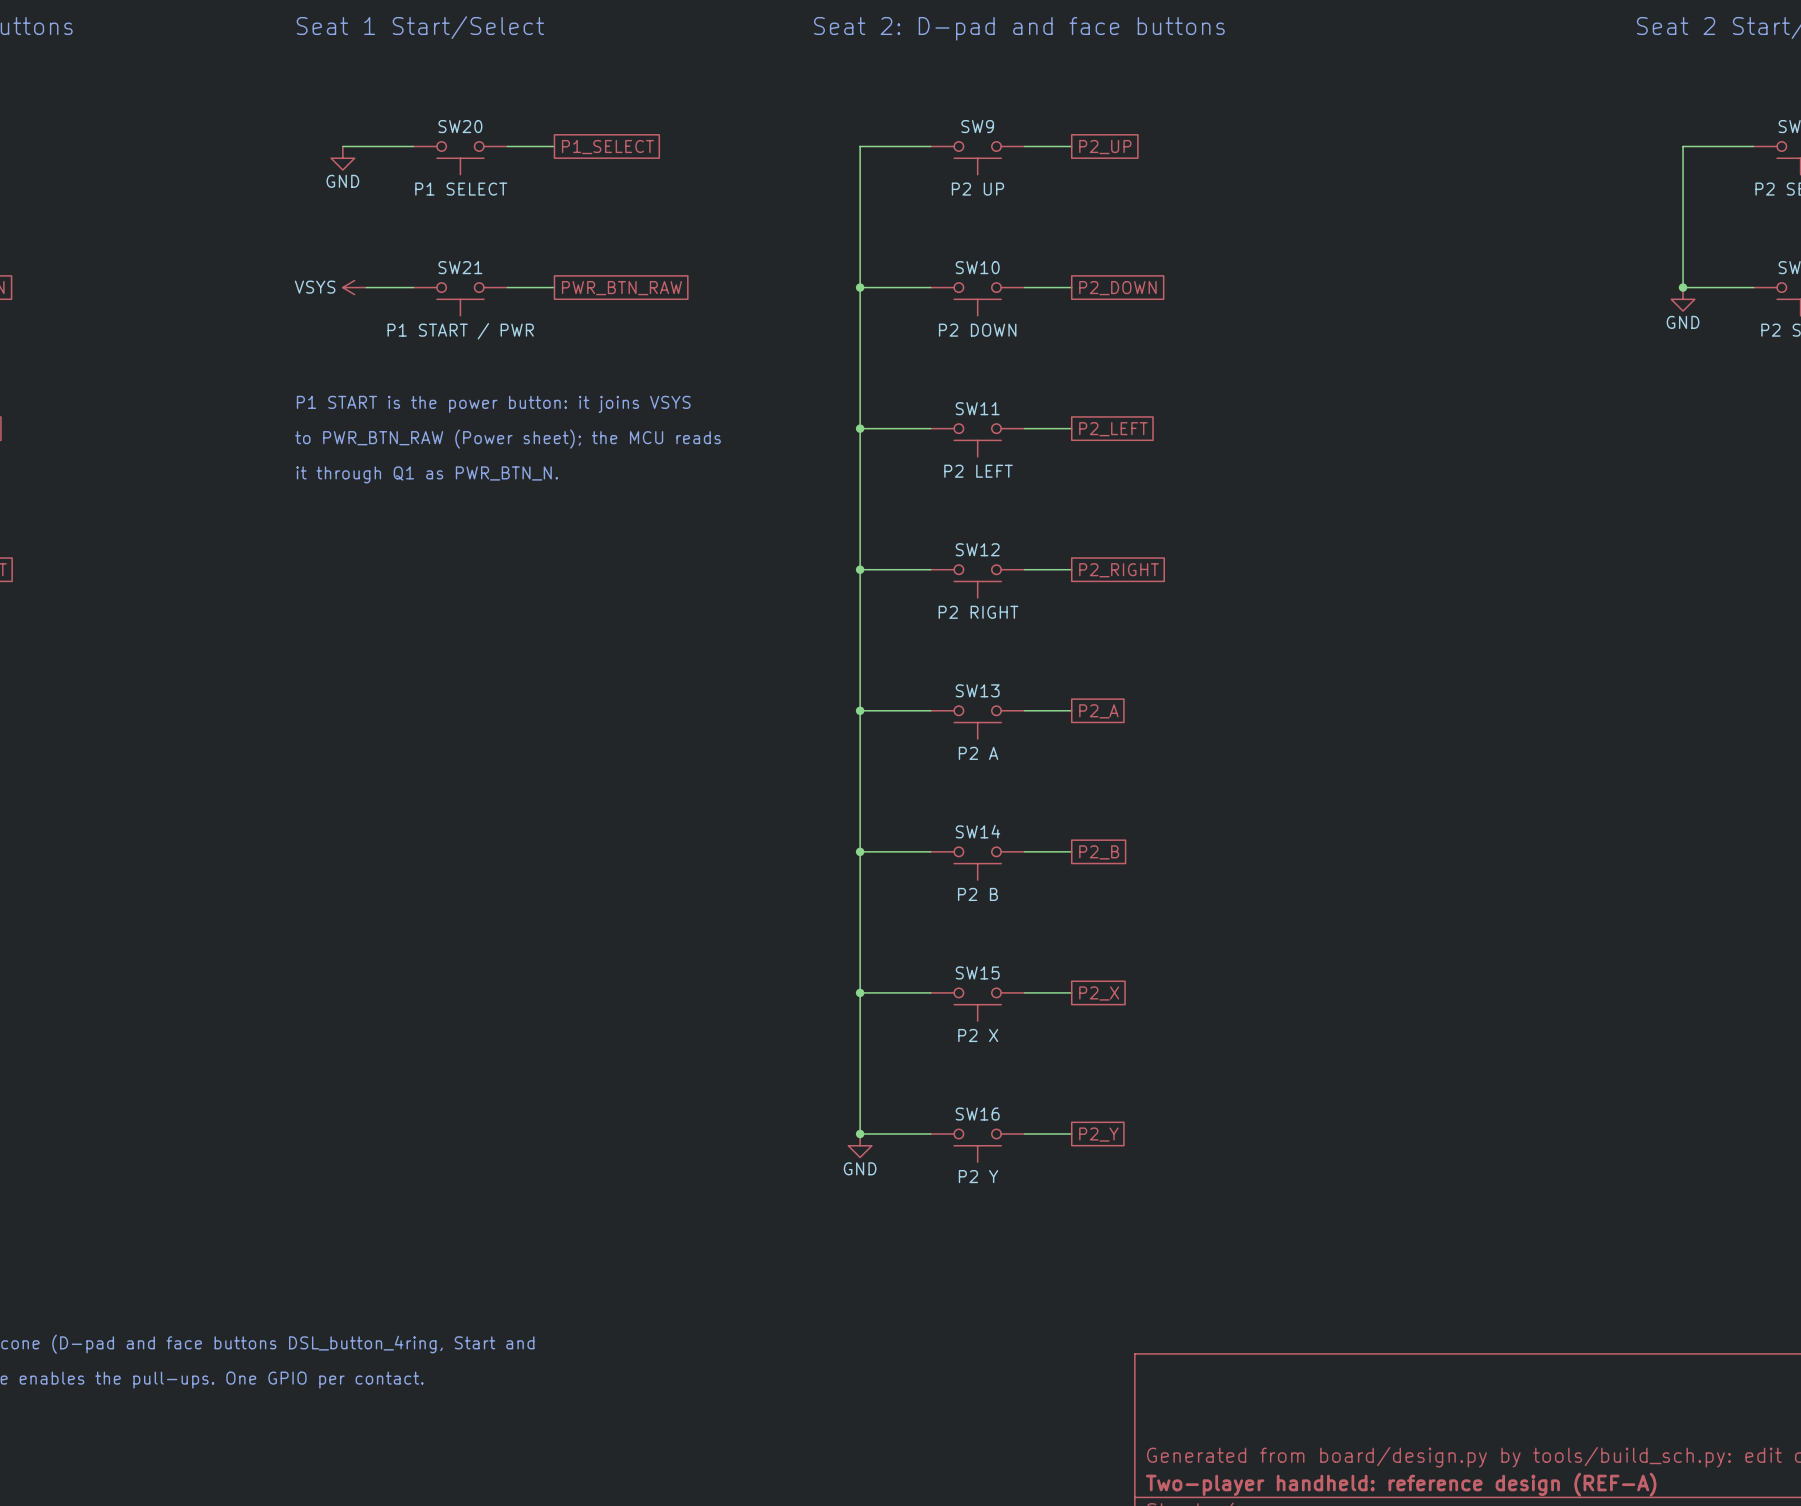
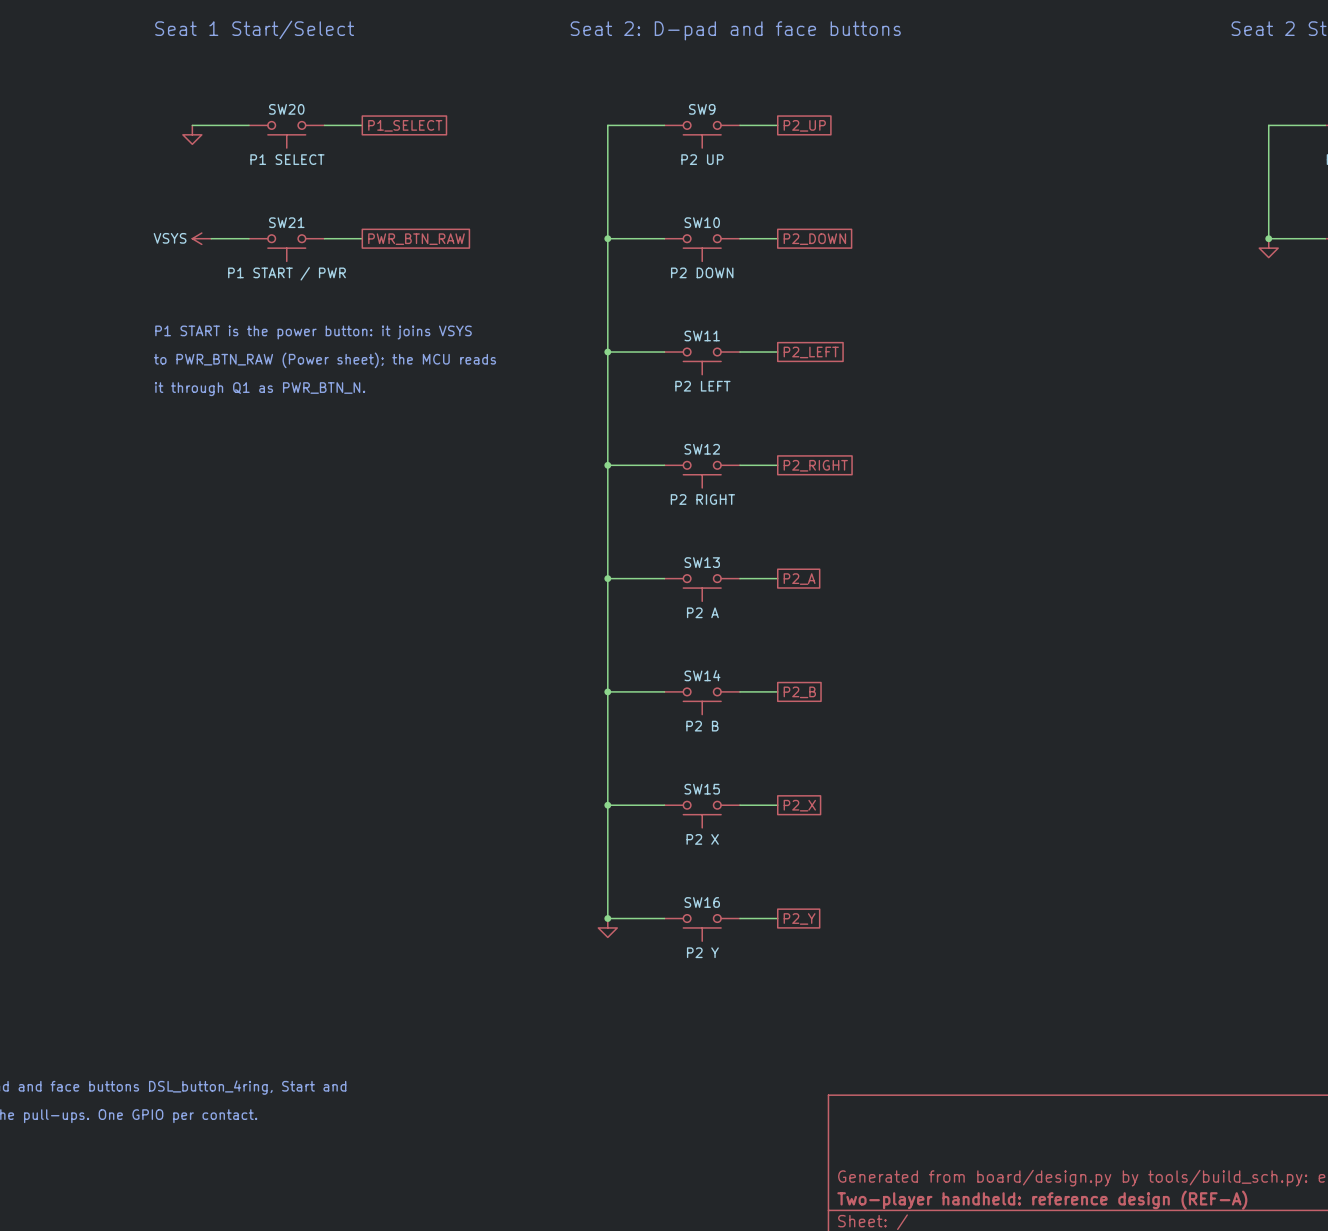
power symbol text: GND (342, 181) -> none
power symbol text: GND (1683, 322) -> none
power symbol text: GND (860, 1168) -> none

